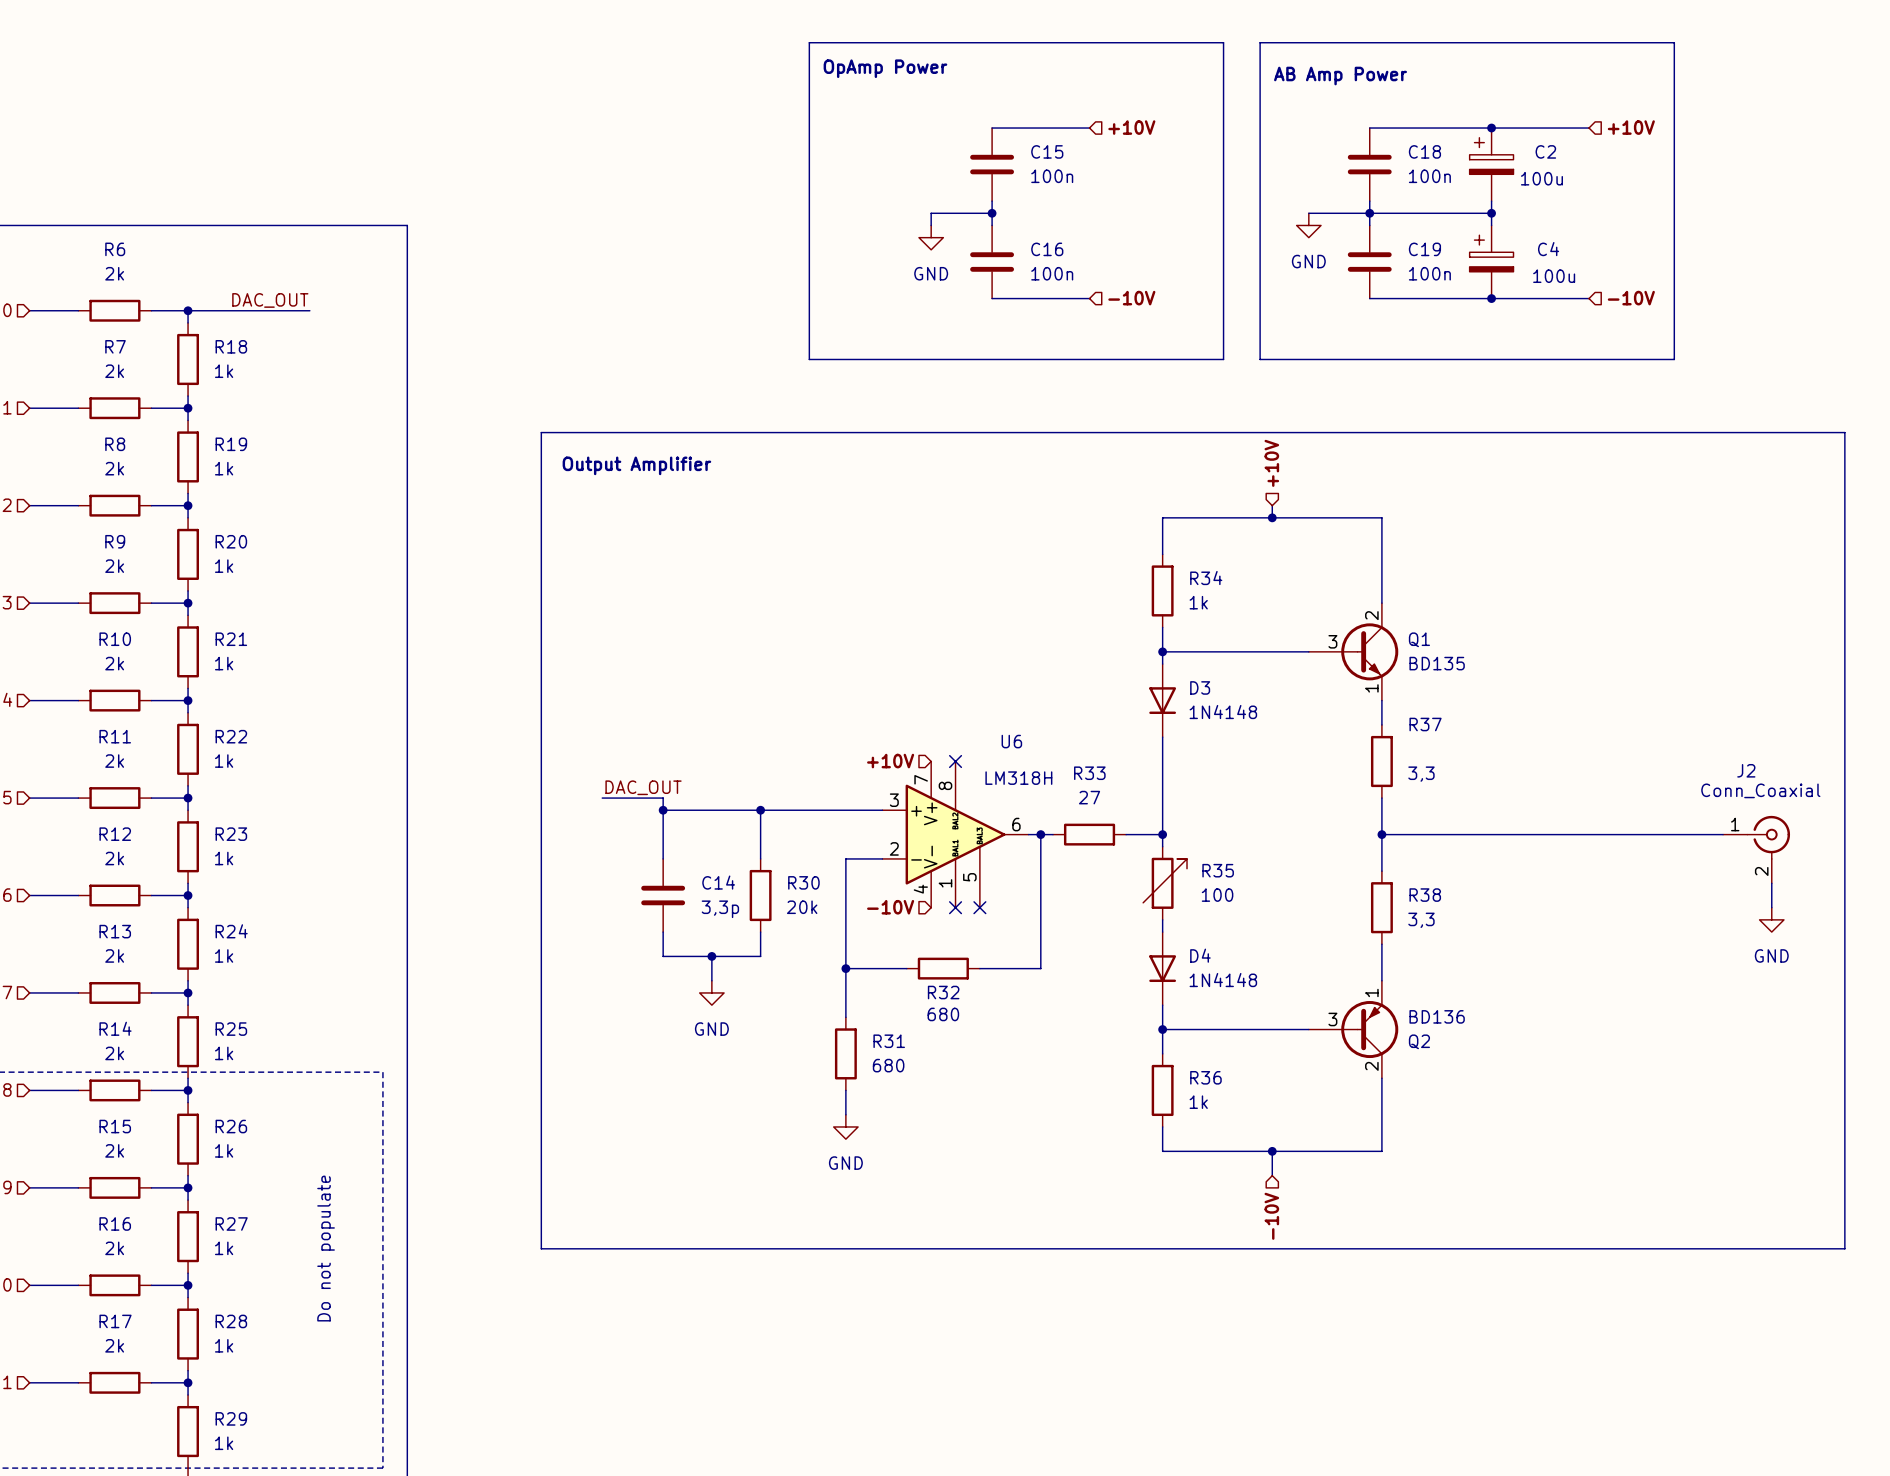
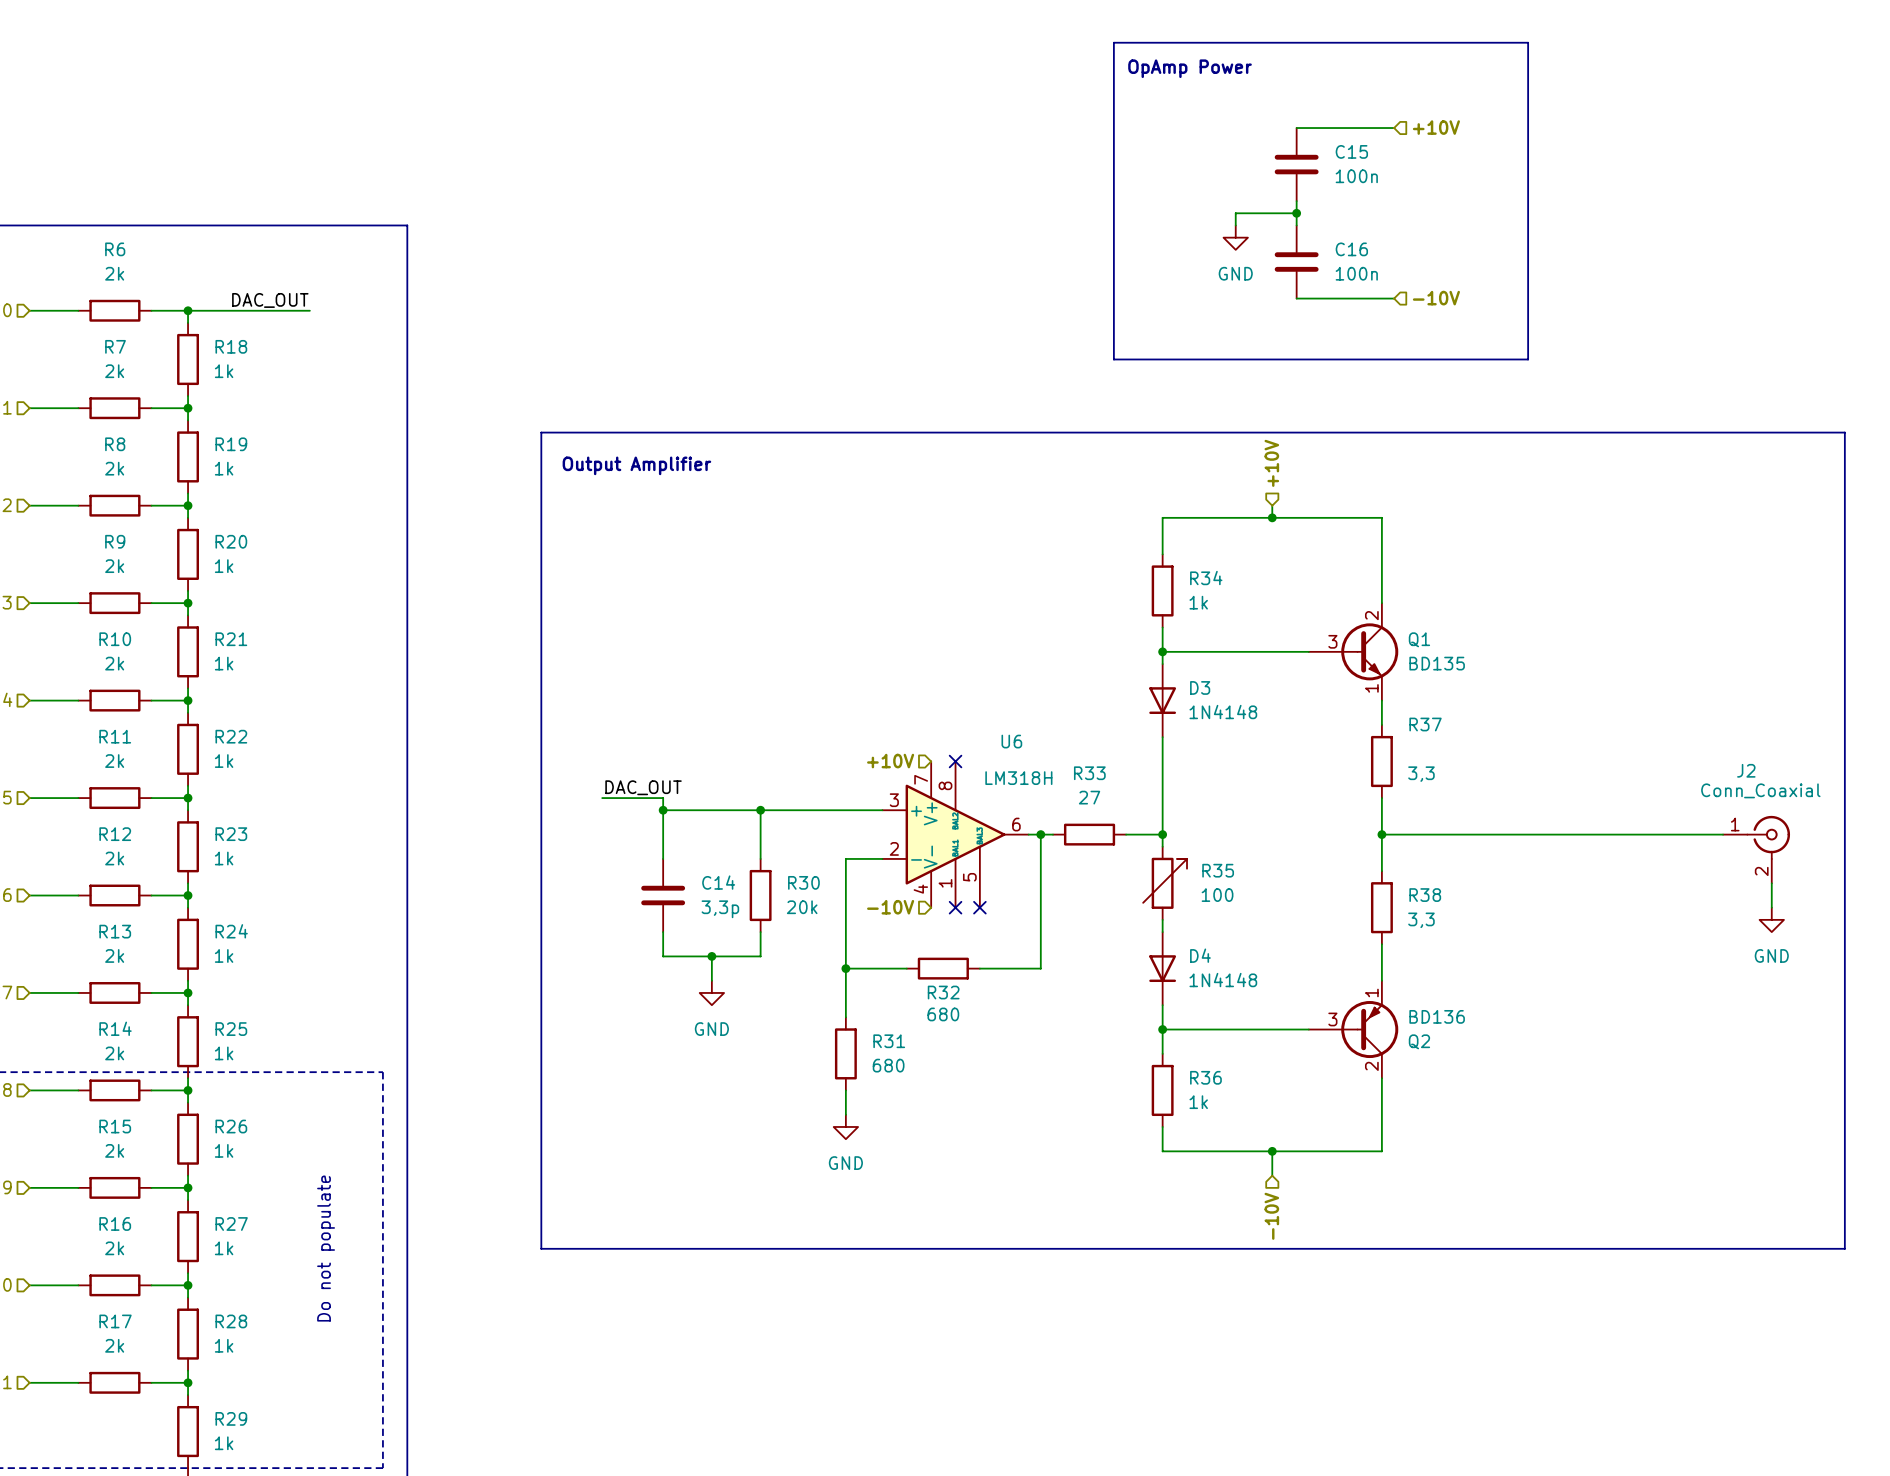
line: (1113, 42) (809, 42) (809, 359) (1113, 359) -> (1113, 42) (1113, 359)
line: (1223, 42) (1223, 359) -> (1223, 42) (1260, 42)
line: (1260, 42) (1260, 359) -> (1223, 359) (1260, 359)
line: (1528, 42) (1674, 42) (1674, 359) (1528, 359) -> (1528, 42) (1528, 359)
text: OpAmp Power (885, 68) -> none
text: AB Amp Power (1340, 76) -> OpAmp Power (1190, 68)
hierarchical label: +10V (1131, 127) -> none
hierarchical label: none -> +10V (1436, 127)
hierarchical label: +10V (1631, 127) -> none
wire: (992, 128) (1089, 128) -> none
wire: none -> (1296, 128) (1369, 128)
wire: (1394, 128) (1589, 128) -> none
junction: (1491, 128) -> none
C15 position: (992, 164) -> (1296, 164)
C18: 100n (1369, 164) -> none
C2: 100u (1491, 164) -> none
wire: (992, 201) (992, 225) -> none
wire: (1369, 201) (1369, 225) -> (1296, 201) (1296, 225)
wire: (1491, 201) (1491, 225) -> none
wire: (992, 213) (931, 213) (931, 225) -> none
junction: (992, 213) -> none
wire: none -> (1296, 213) (1235, 213) (1235, 225)
junction: none -> (1296, 213)
wire: (1308, 213) (1491, 213) -> none
junction: (1369, 213) -> none
junction: (1491, 213) -> none
power symbol position: GND (1308, 225) -> GND (1235, 237)
power symbol: GND (931, 237) -> none
C16 position: (992, 262) -> (1296, 262)
C19: 100n (1369, 262) -> none
C4: 100u (1491, 262) -> none
wire: (992, 298) (1089, 298) -> none
hierarchical label: -10V (1131, 298) -> none
wire: none -> (1296, 298) (1369, 298)
wire: (1394, 298) (1589, 298) -> none
hierarchical label: none -> -10V (1436, 298)
junction: (1491, 298) -> none
hierarchical label: -10V (1631, 298) -> none

